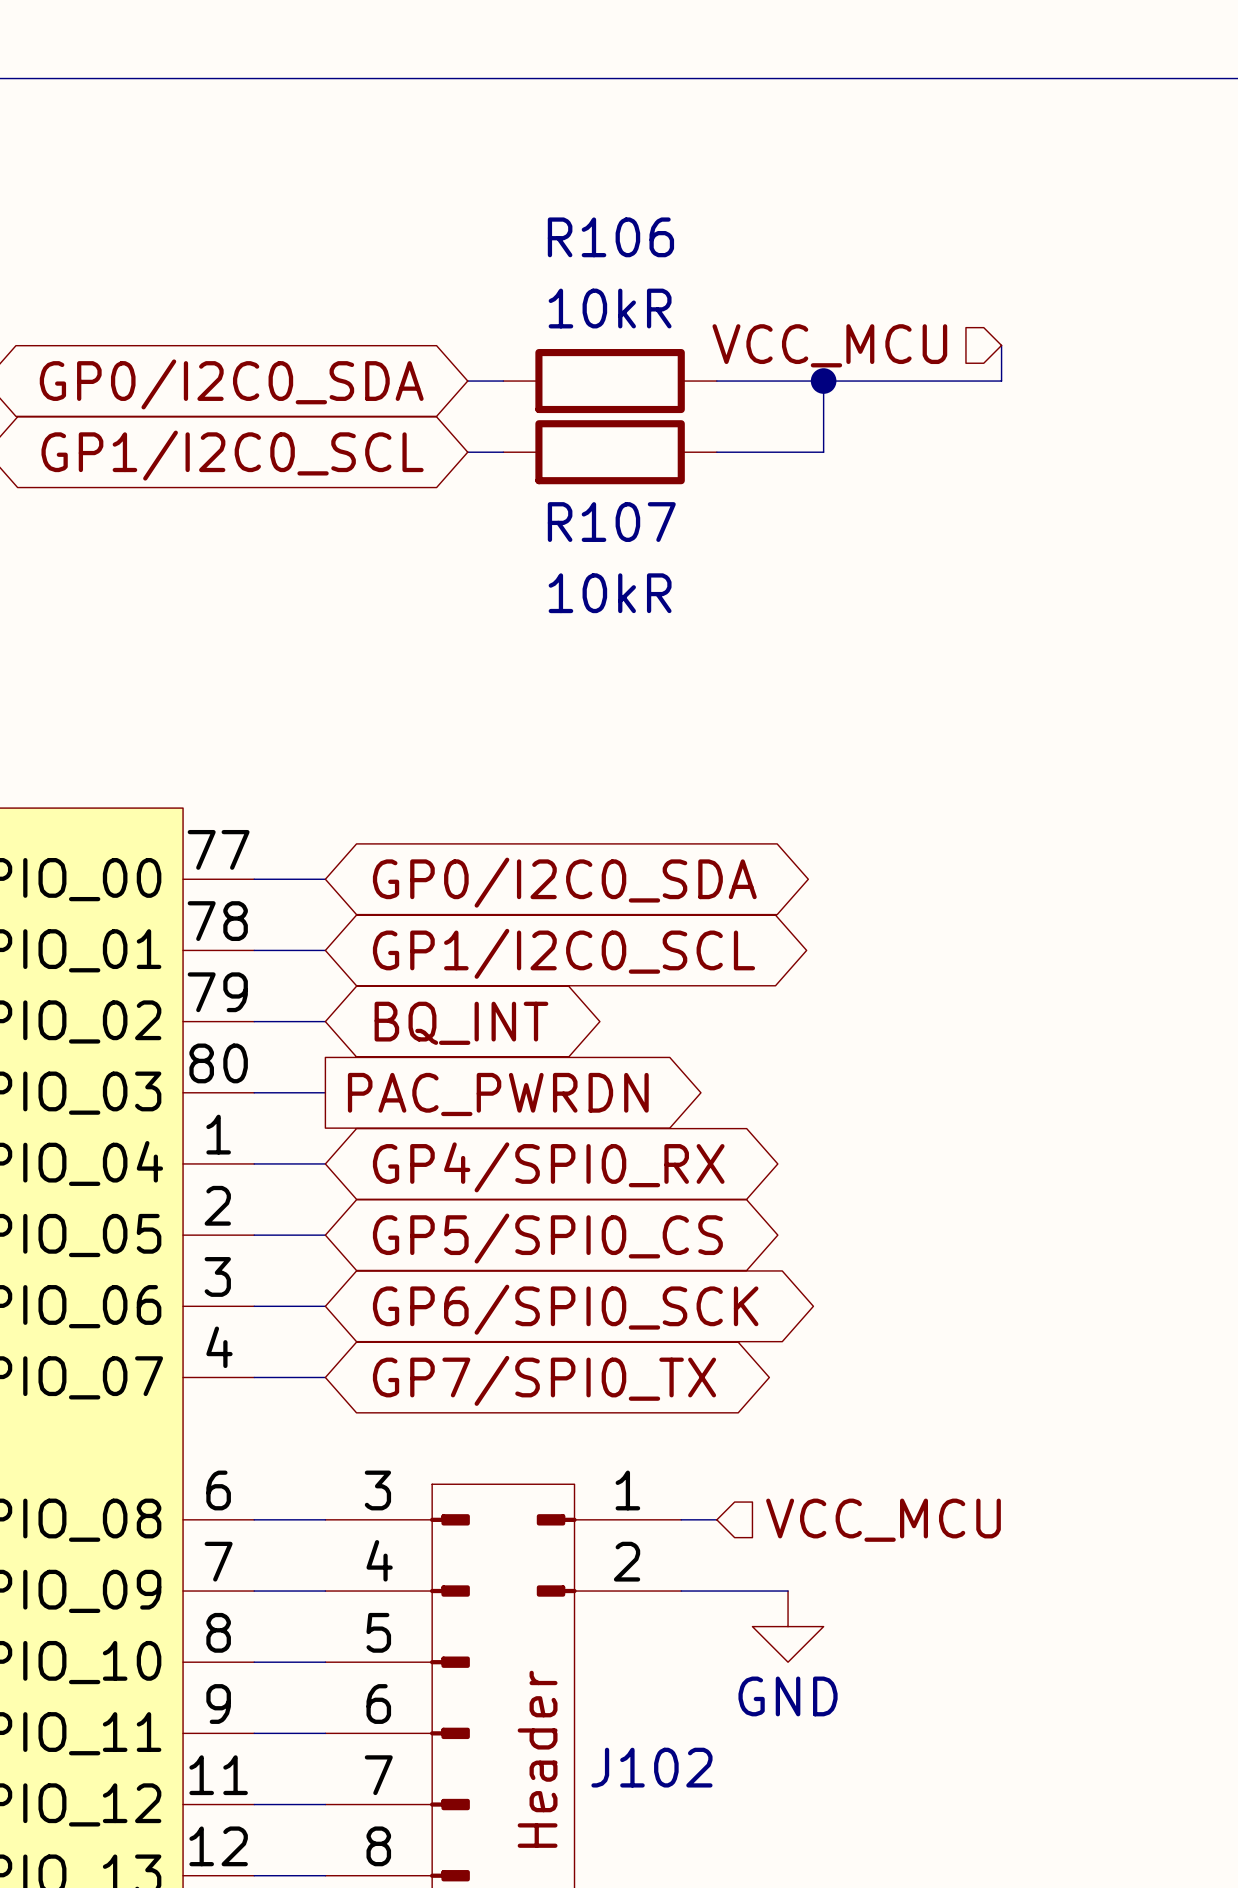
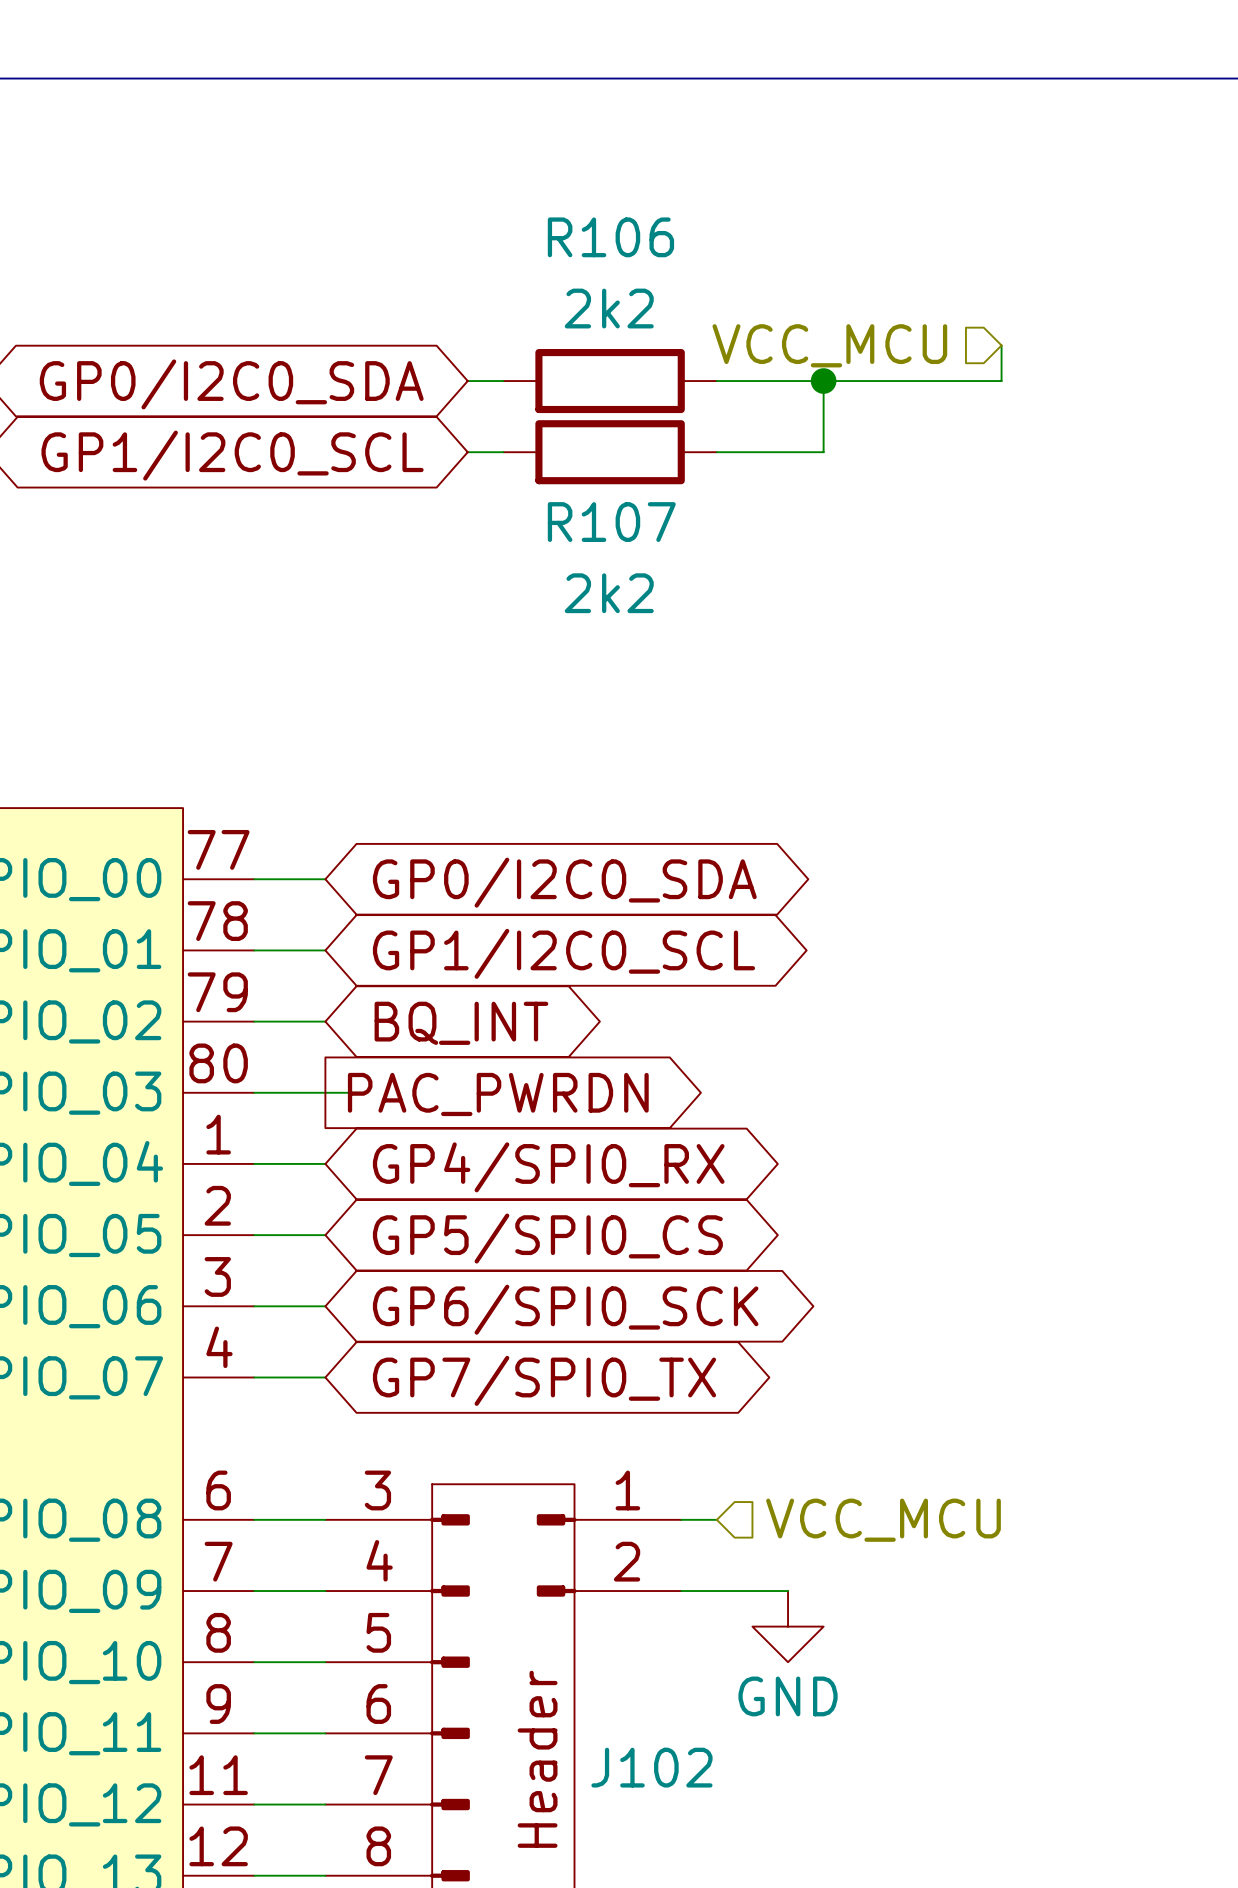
R106 value: 10kR (610, 308) -> 2k2 (609, 308)
R107 value: 10kR (610, 593) -> 2k2 (609, 593)
wire: none -> (325, 1092) (360, 1092)

